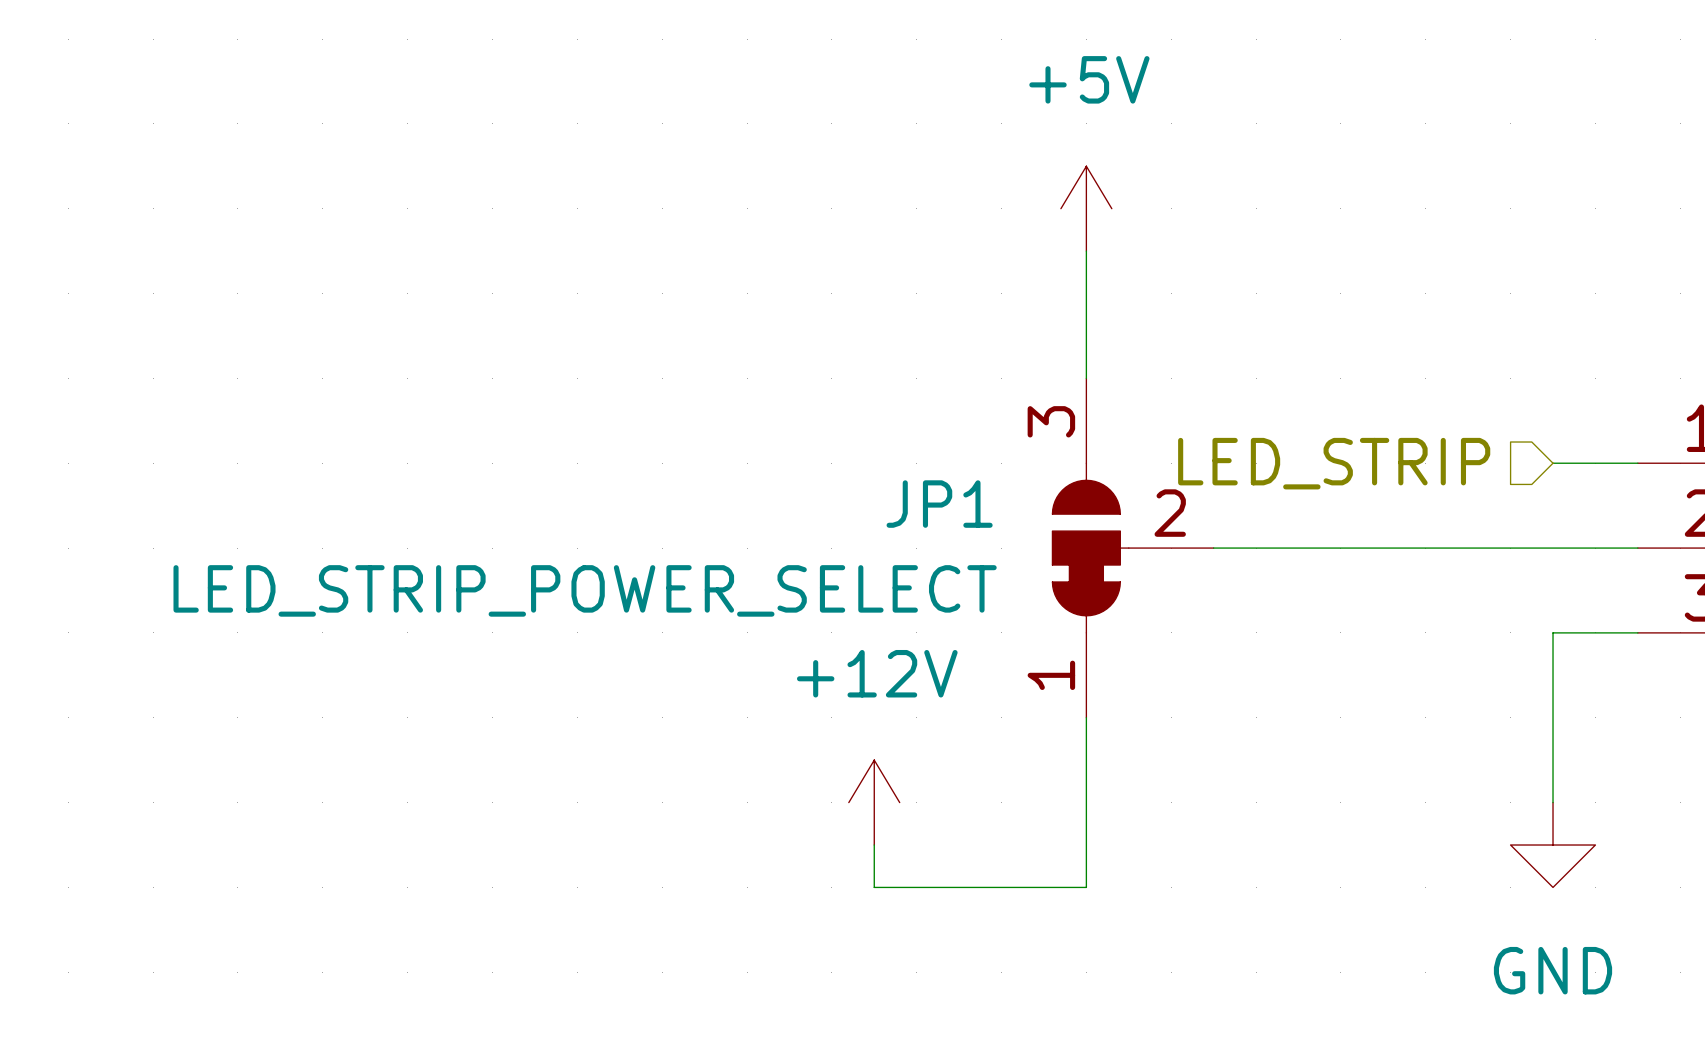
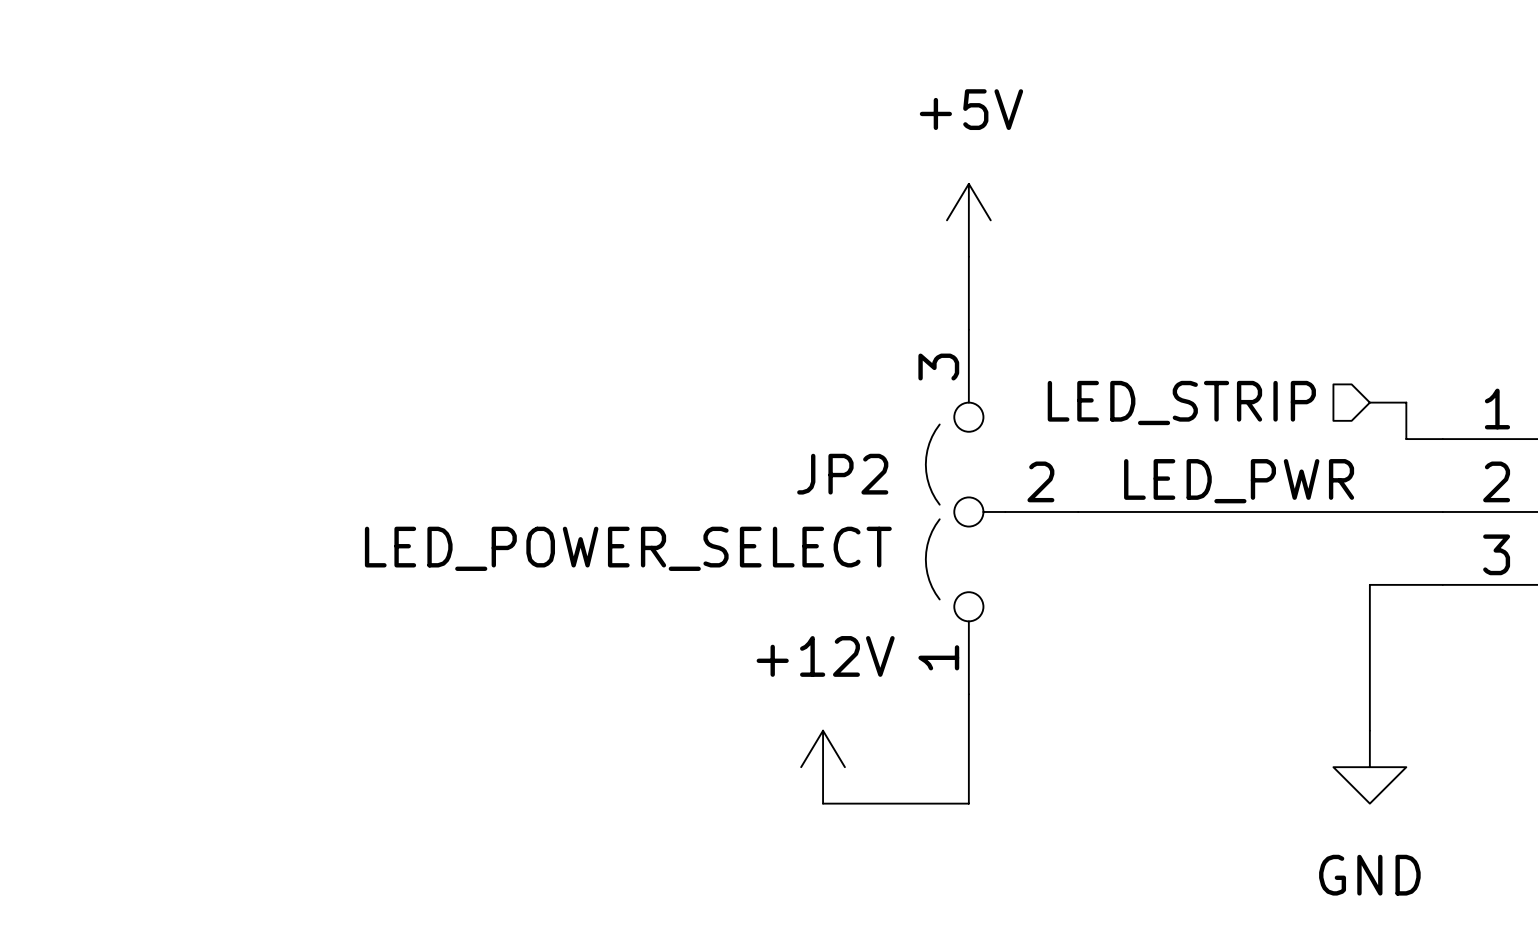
hierarchical label position: LED_STRIP (1334, 463) -> LED_STRIP (1181, 402)
wire: (1553, 463) (1595, 463) -> (1369, 402) (1406, 402) (1406, 439)
label: none -> LED_PWR (1239, 481)
JP2: none -> LED_POWER_SELECT (1002, 511)
JP1: LED_STRIP_POWER_SELECT (1133, 548) -> none
power symbol position: +12V (874, 802) -> +12V (823, 767)
wire: (874, 845) (874, 887) (916, 887) -> none

